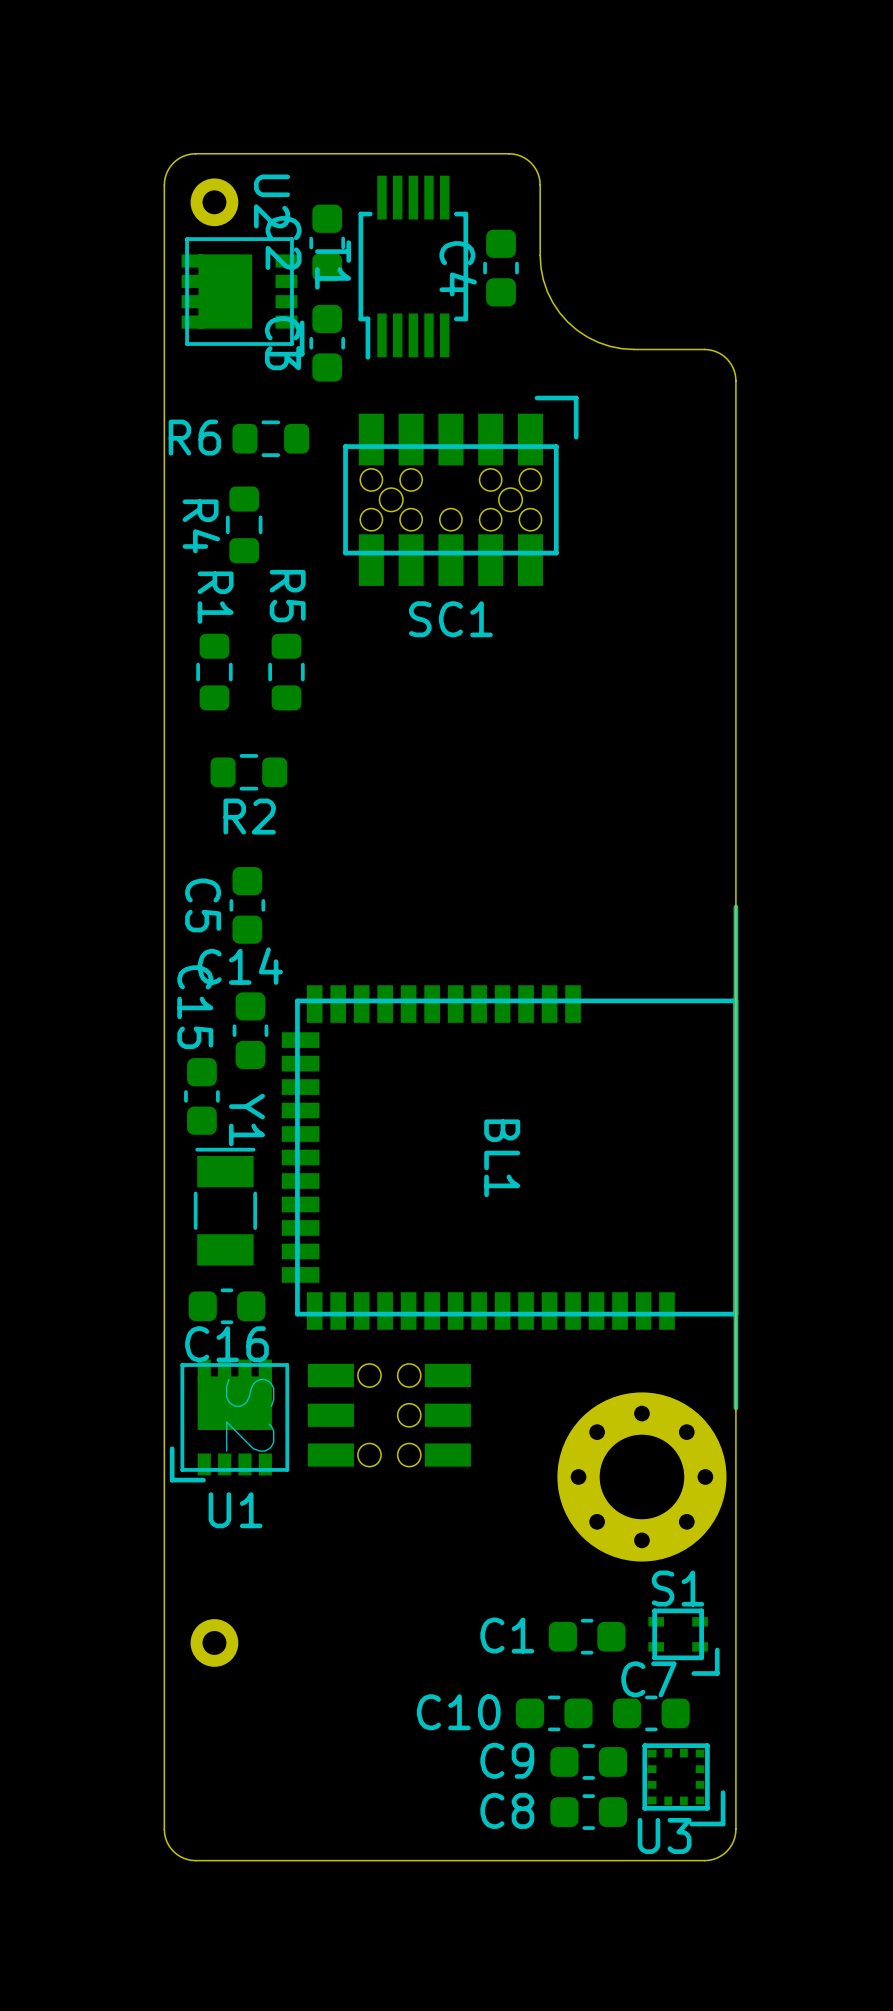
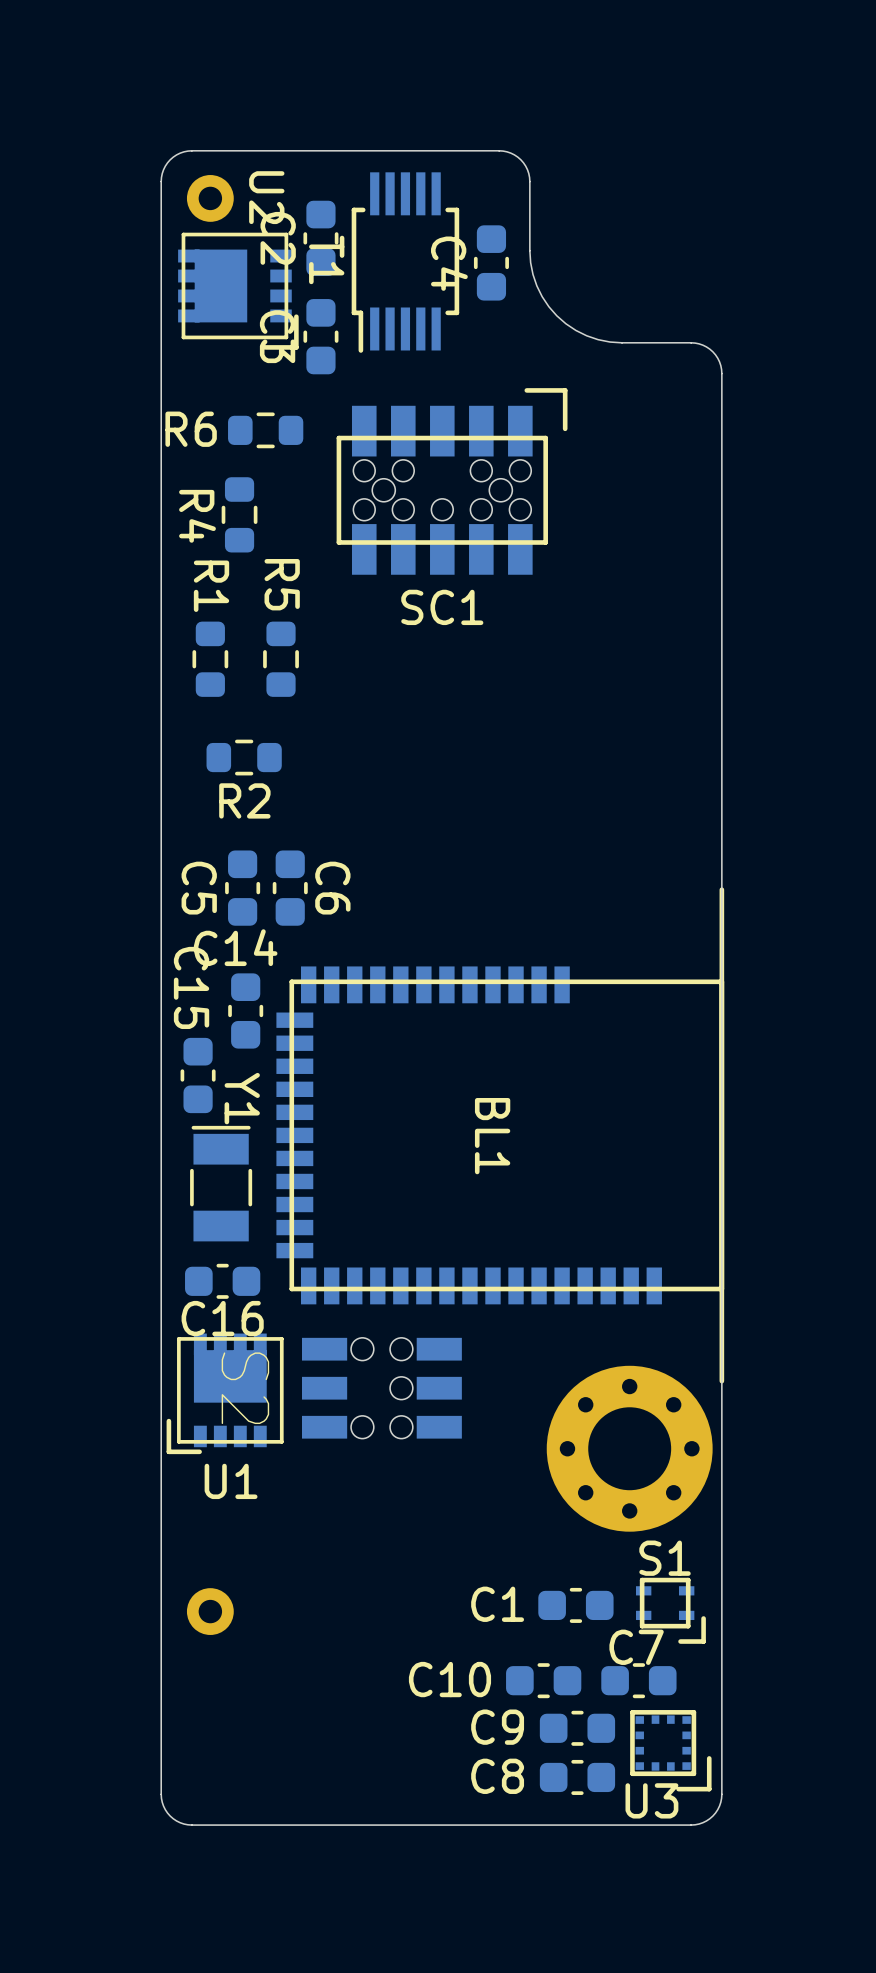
C6: none -> (290, 888)

